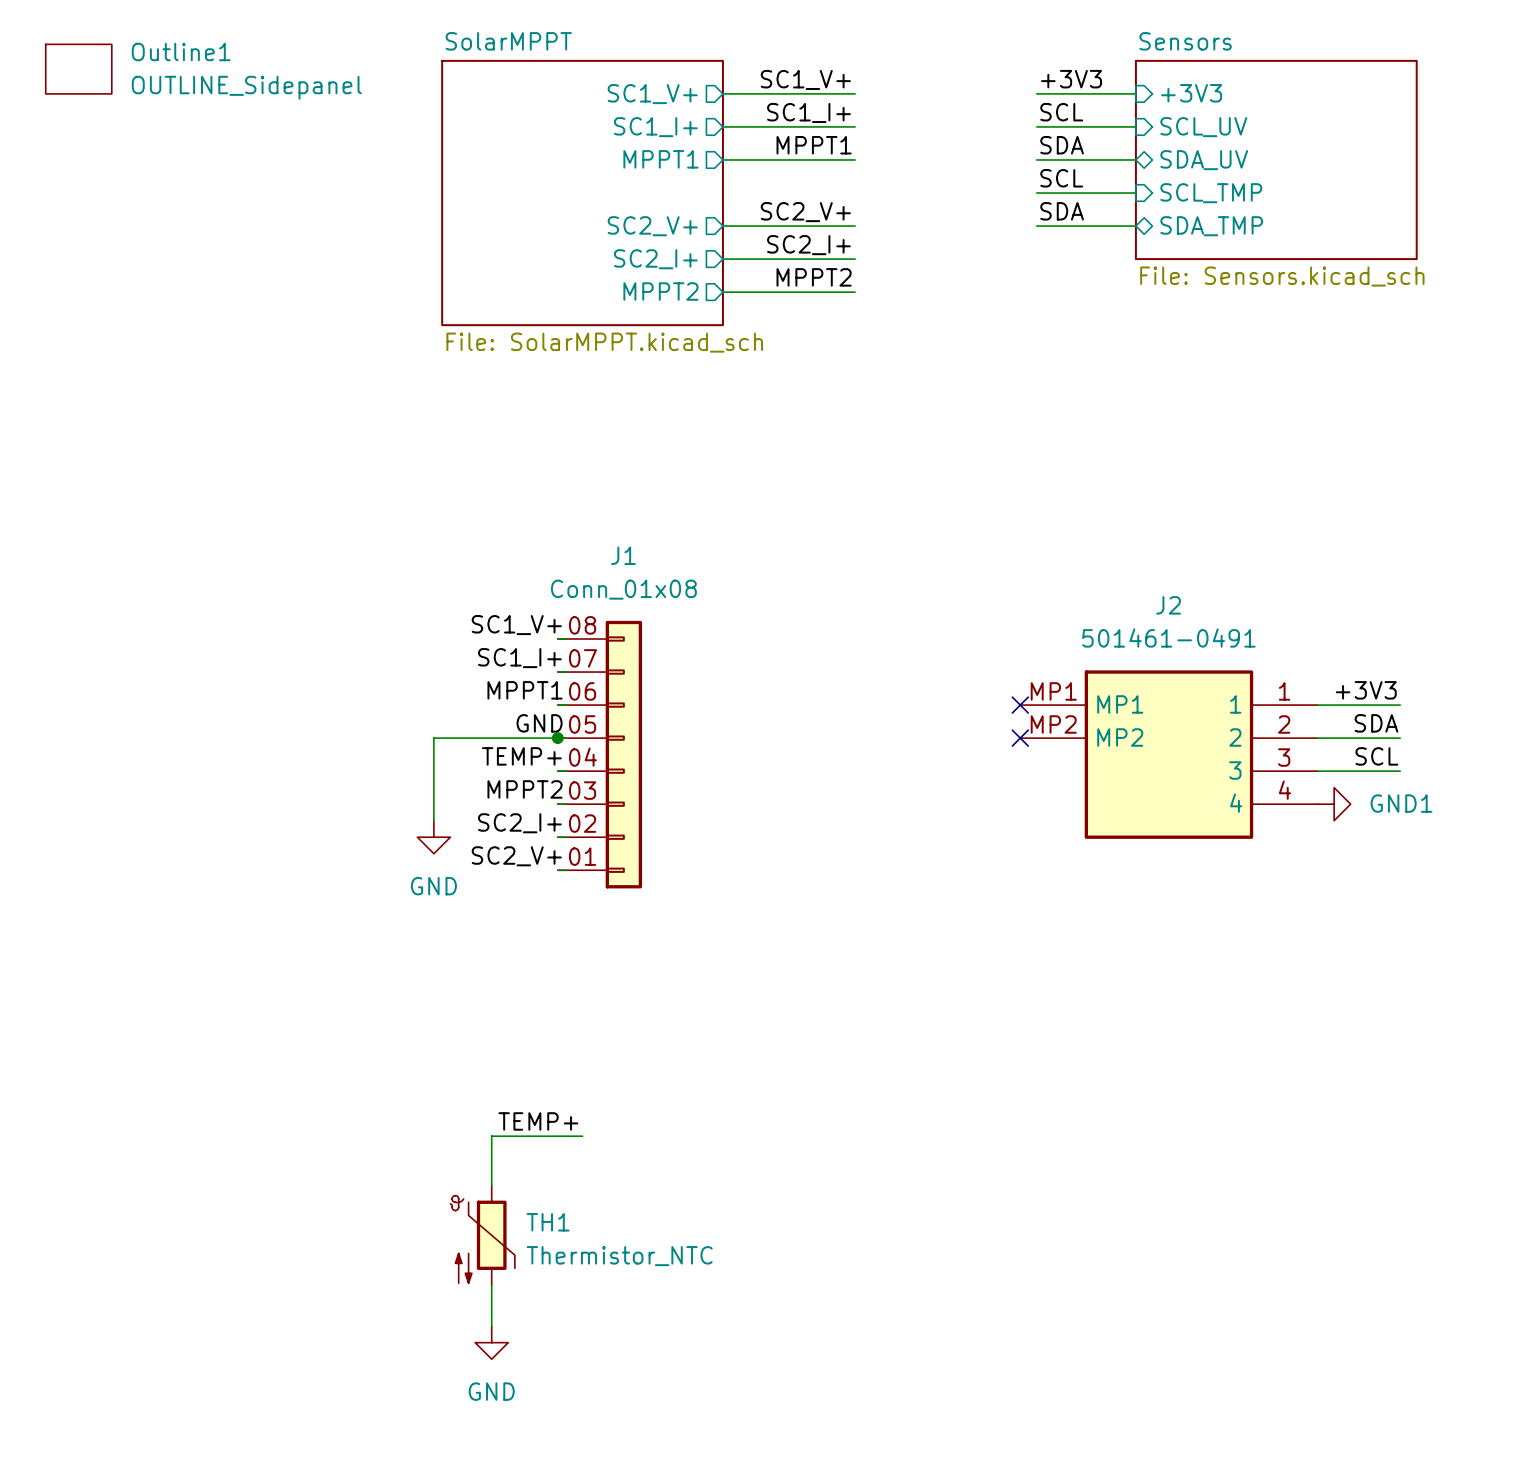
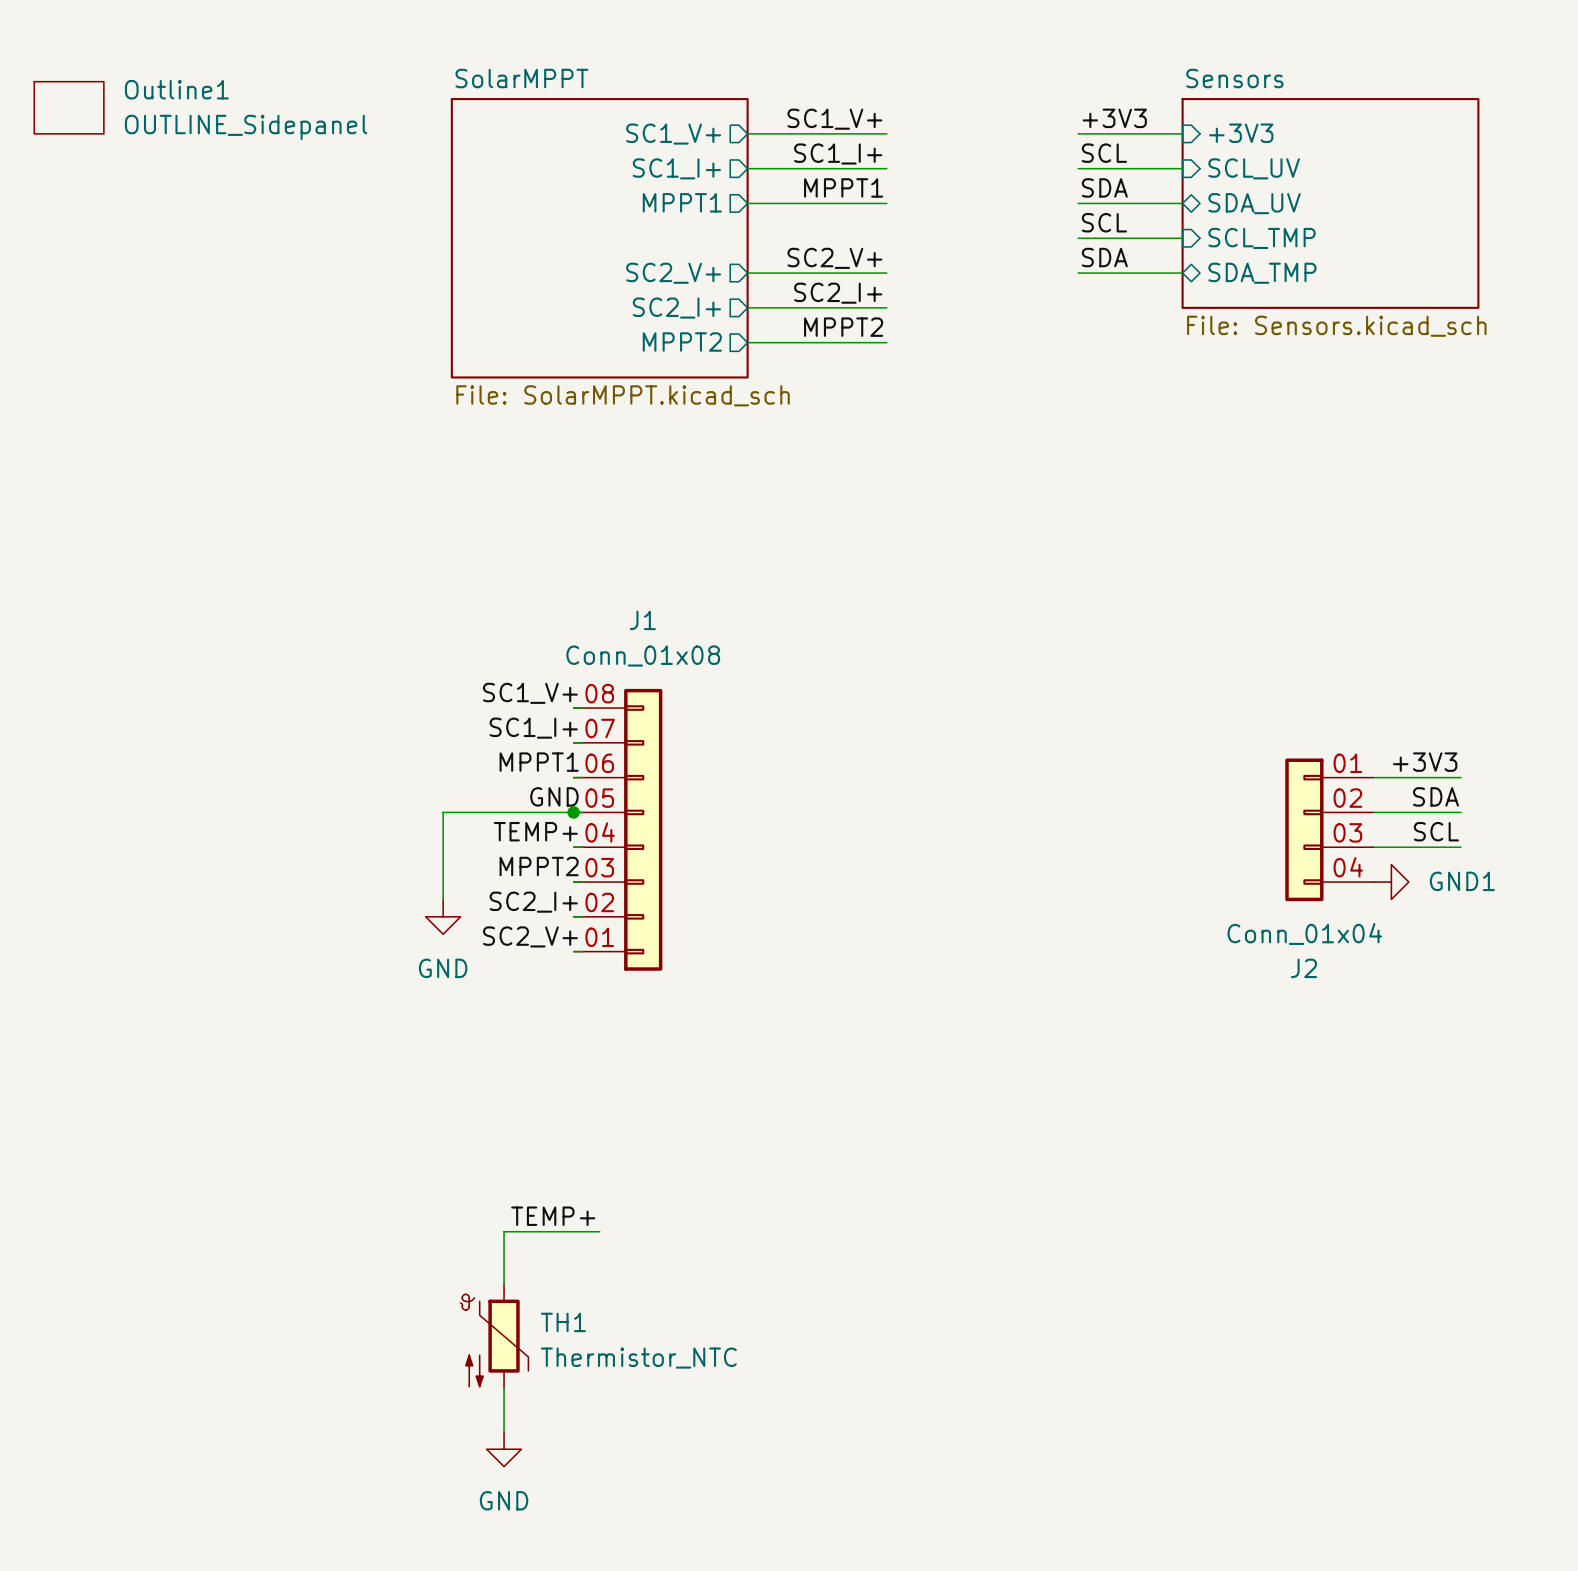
no-connect mark: (1020, 705) -> none
no-connect mark: (1020, 738) -> none
part: (1168, 754) -> none
J2: none -> Conn_01x04 (1329, 829)

